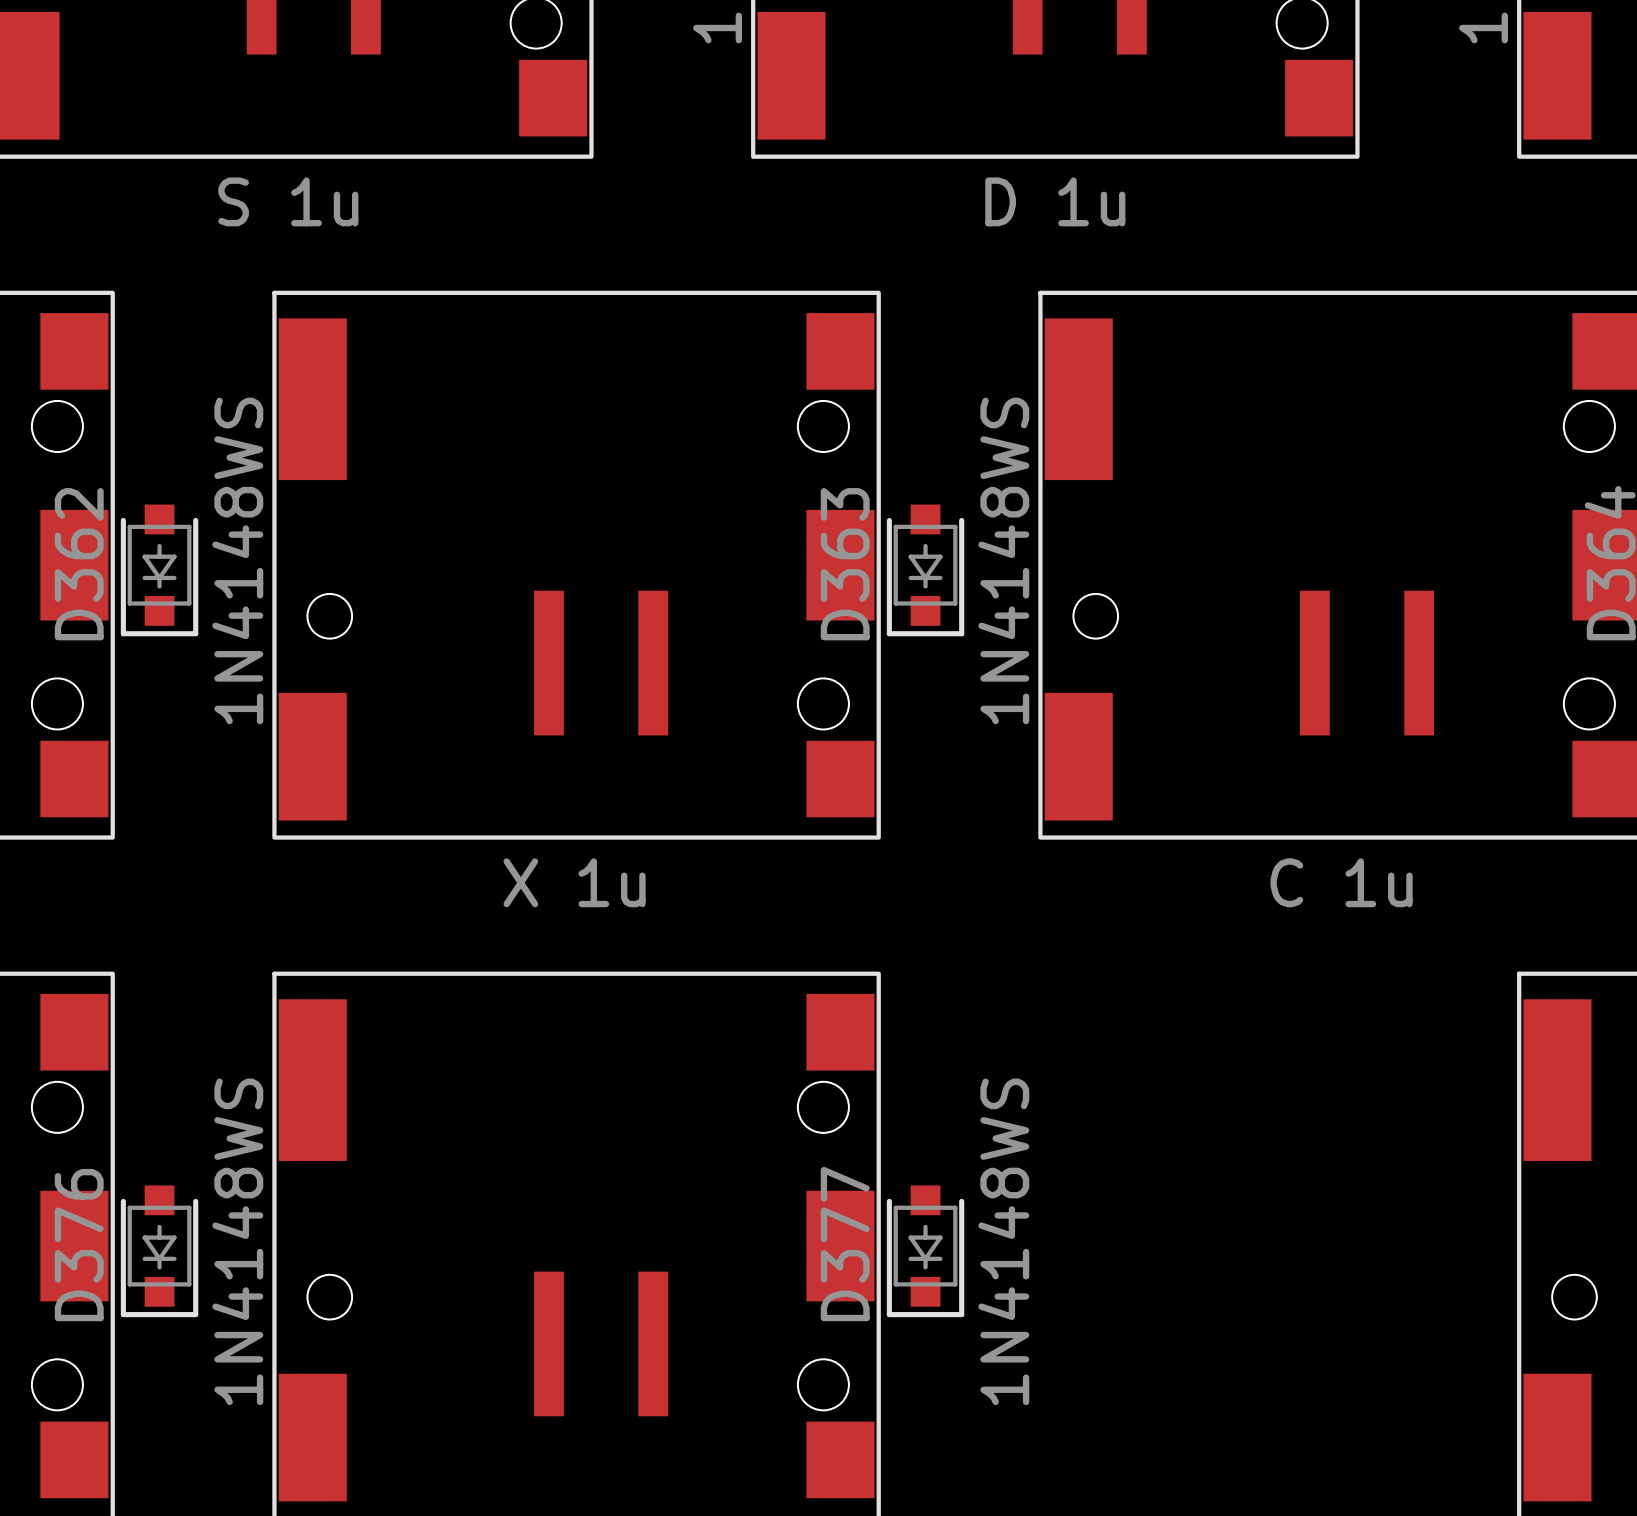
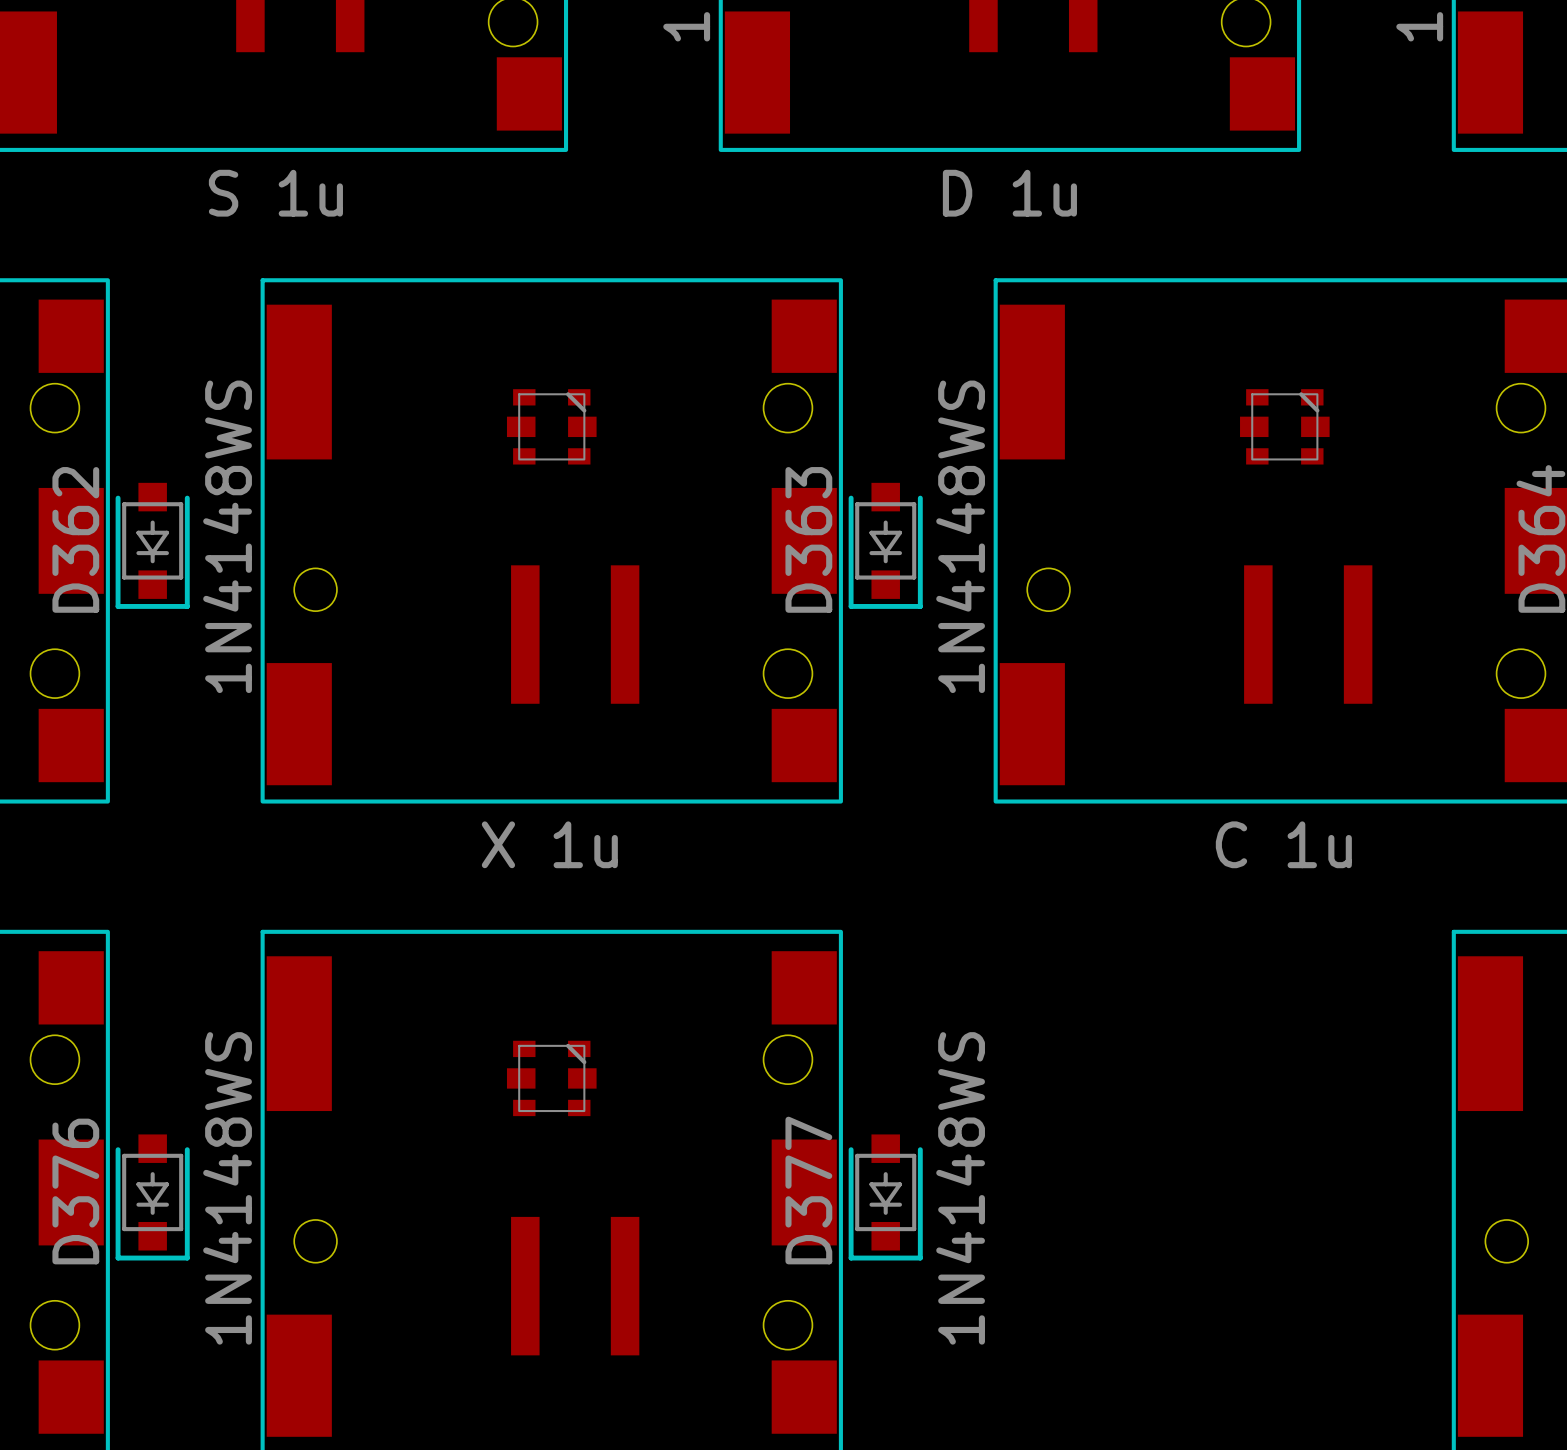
part: none -> (551, 426)
part: none -> (1284, 426)
part: none -> (551, 1078)

